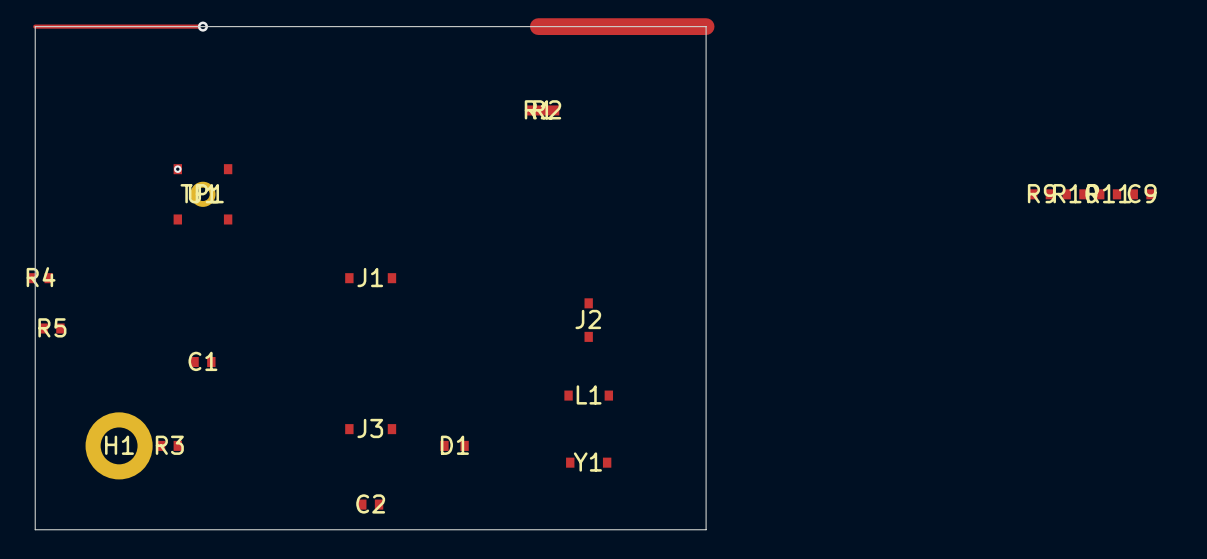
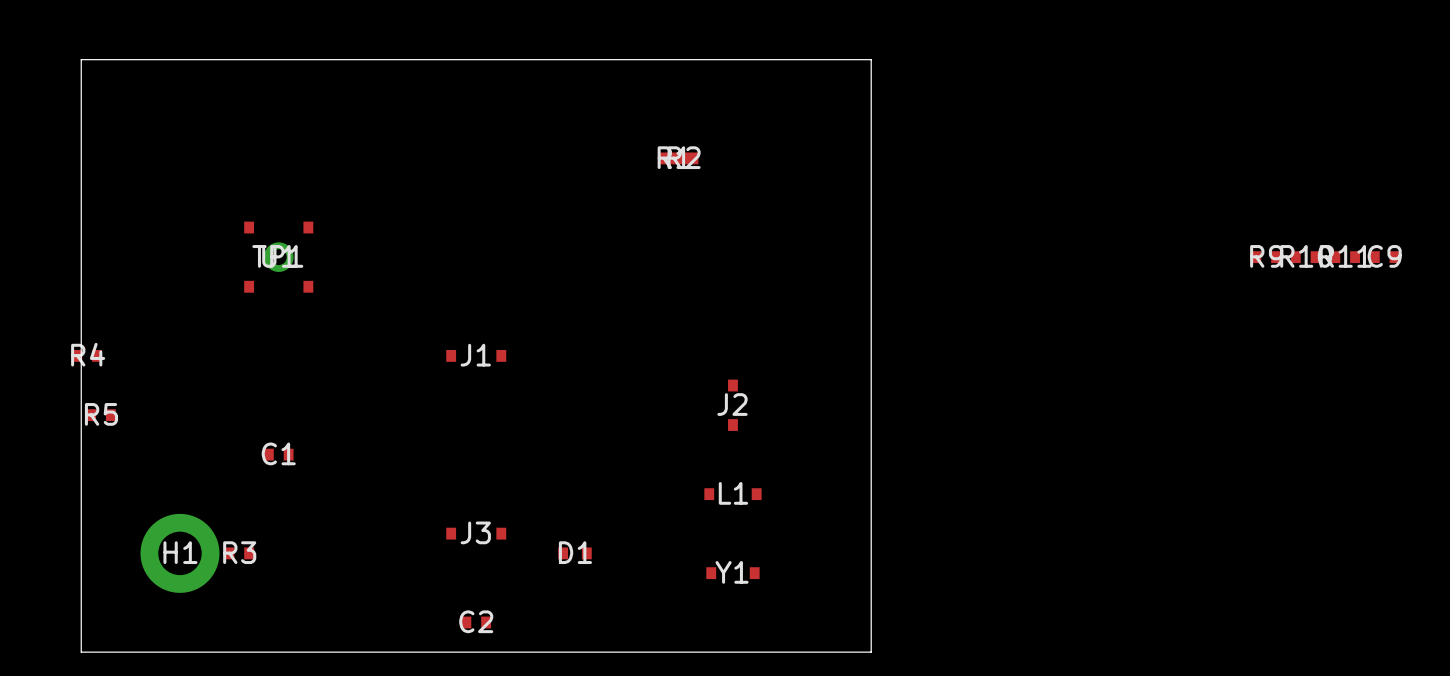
top track: (35, 26) (202, 26) -> none
via: (202, 26) -> none
top track: (538, 26) (706, 26) (538, 26) -> none
via: (177, 169) -> none

